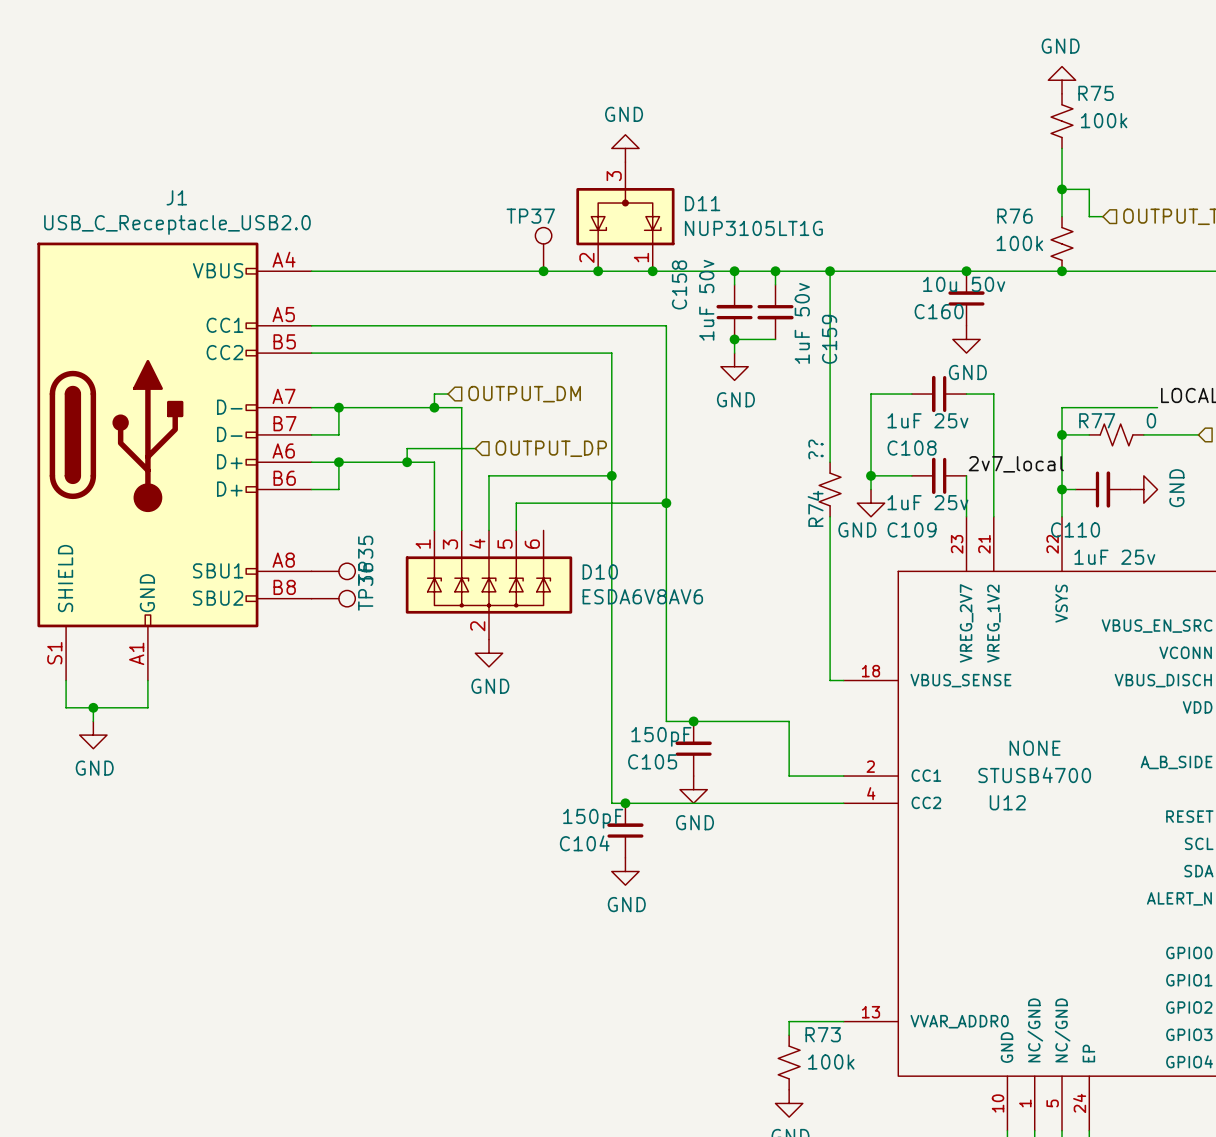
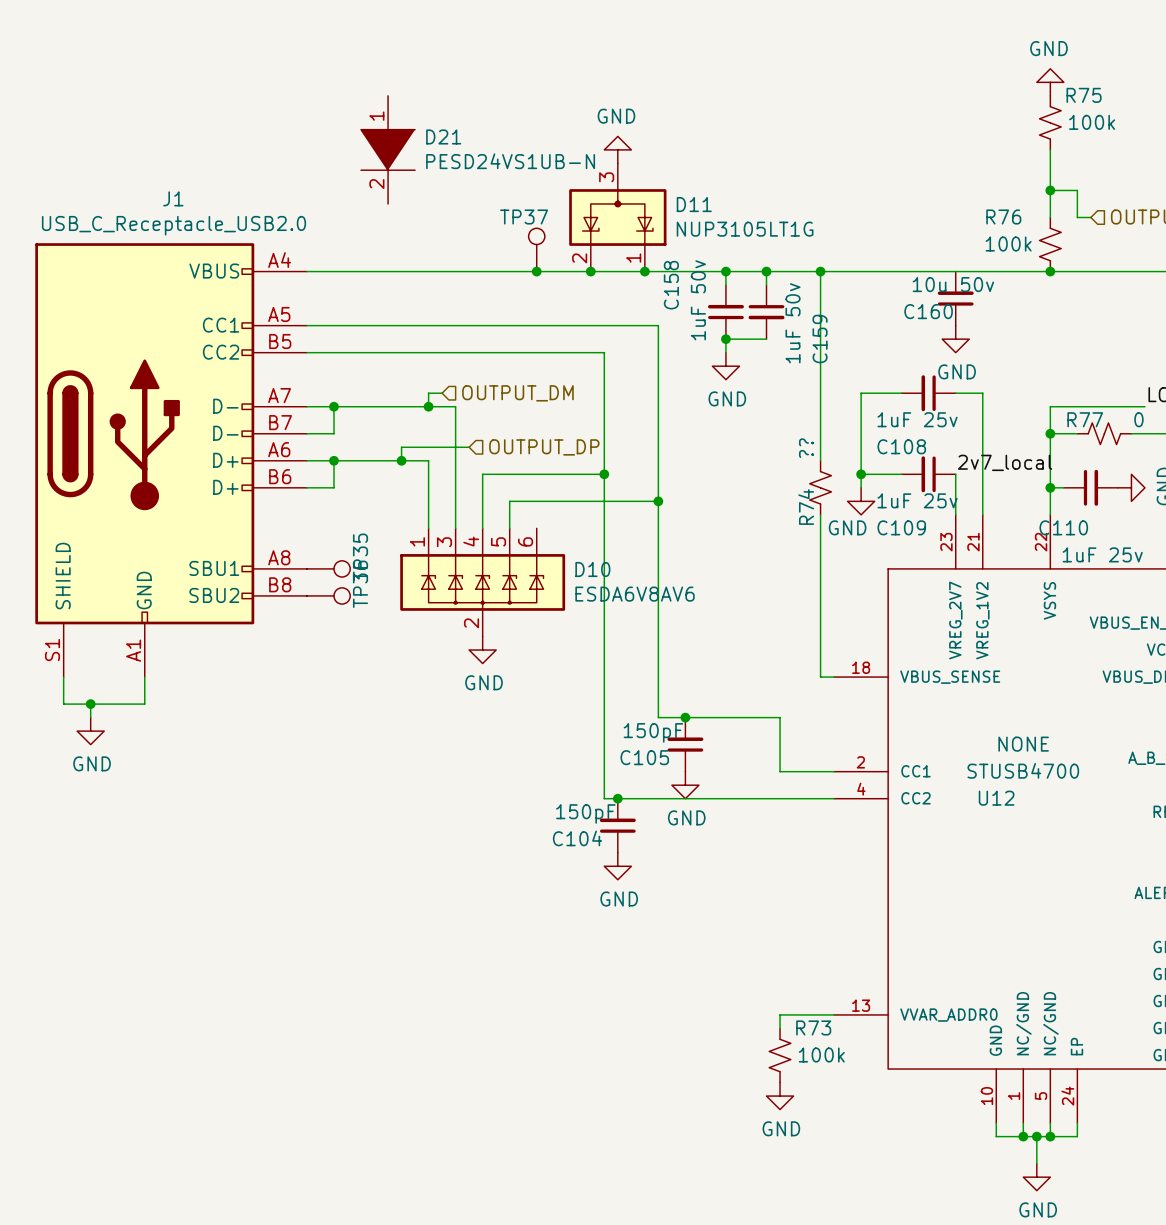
D21: none -> PESD24VS1UB-N (388, 149)
junction: (966, 271) -> none

